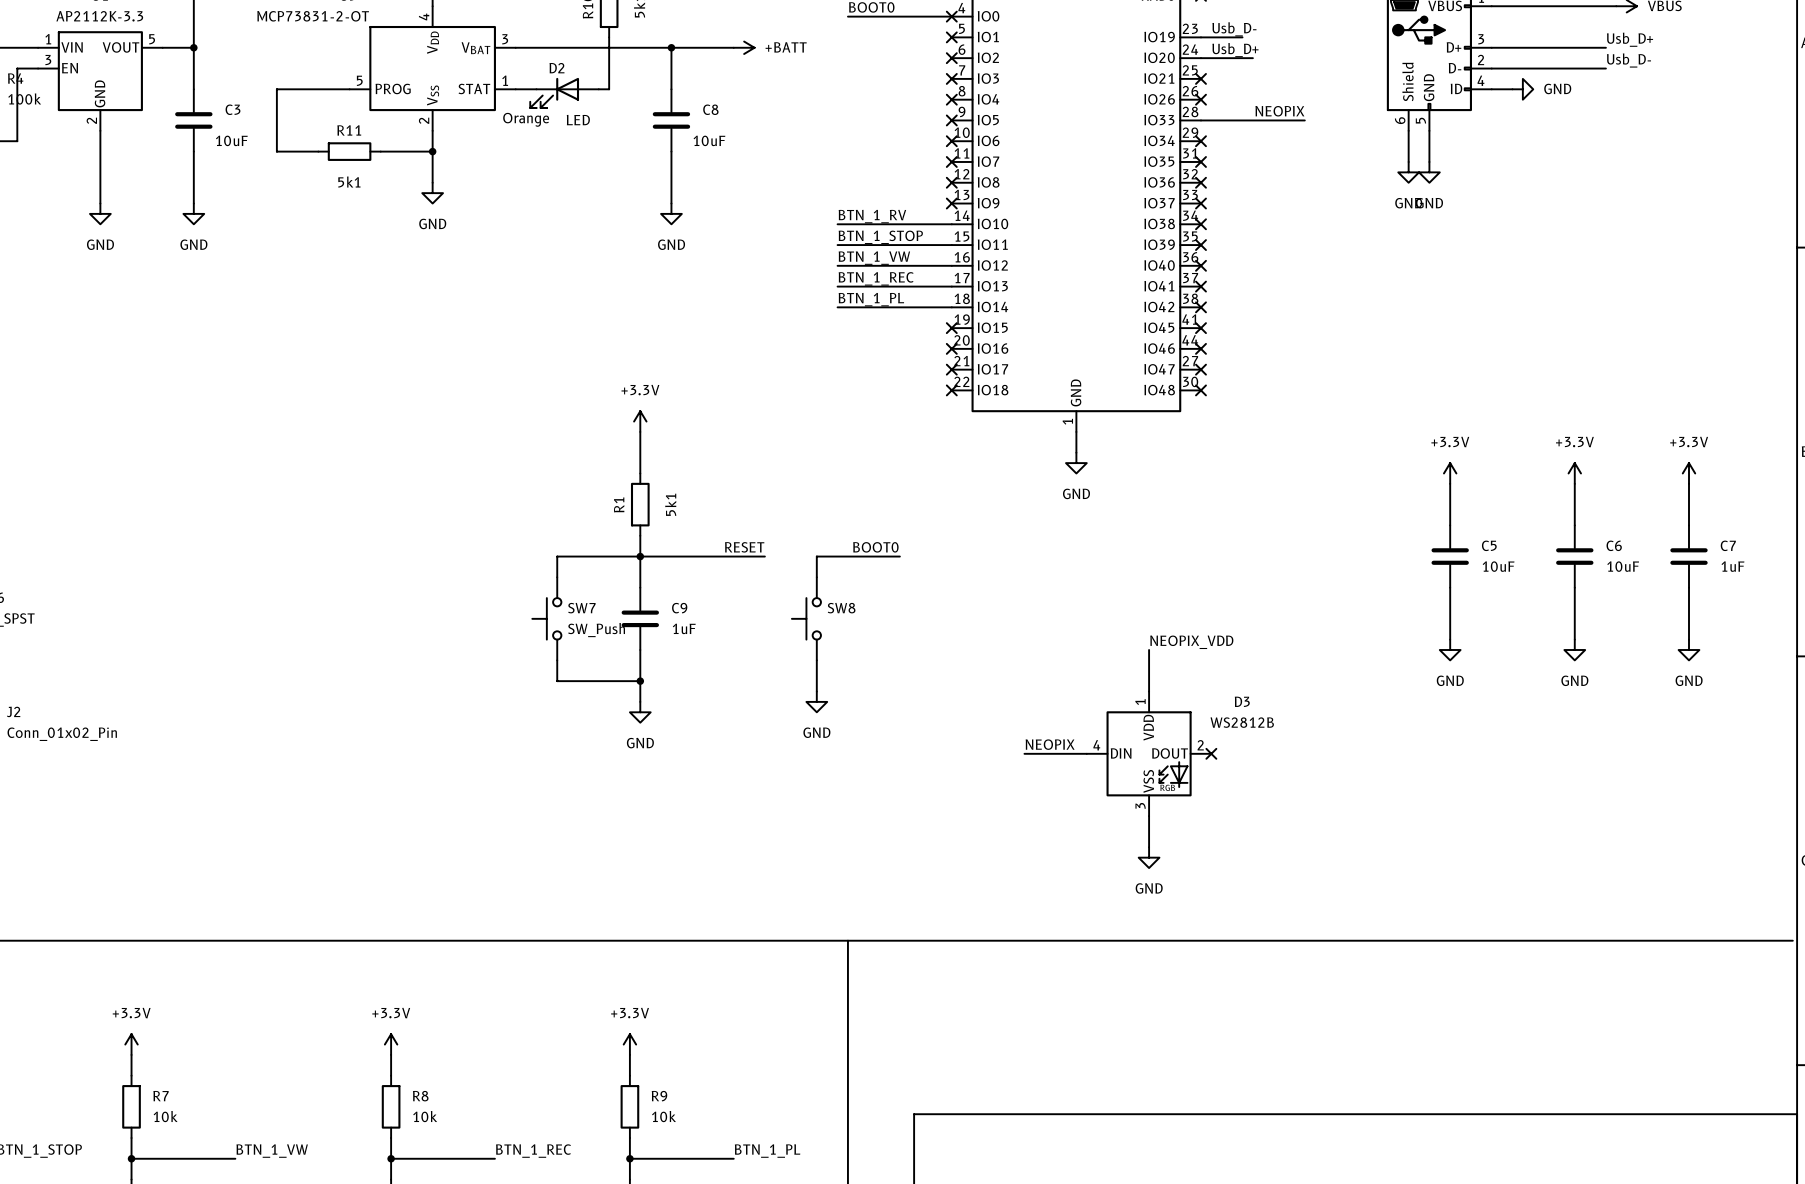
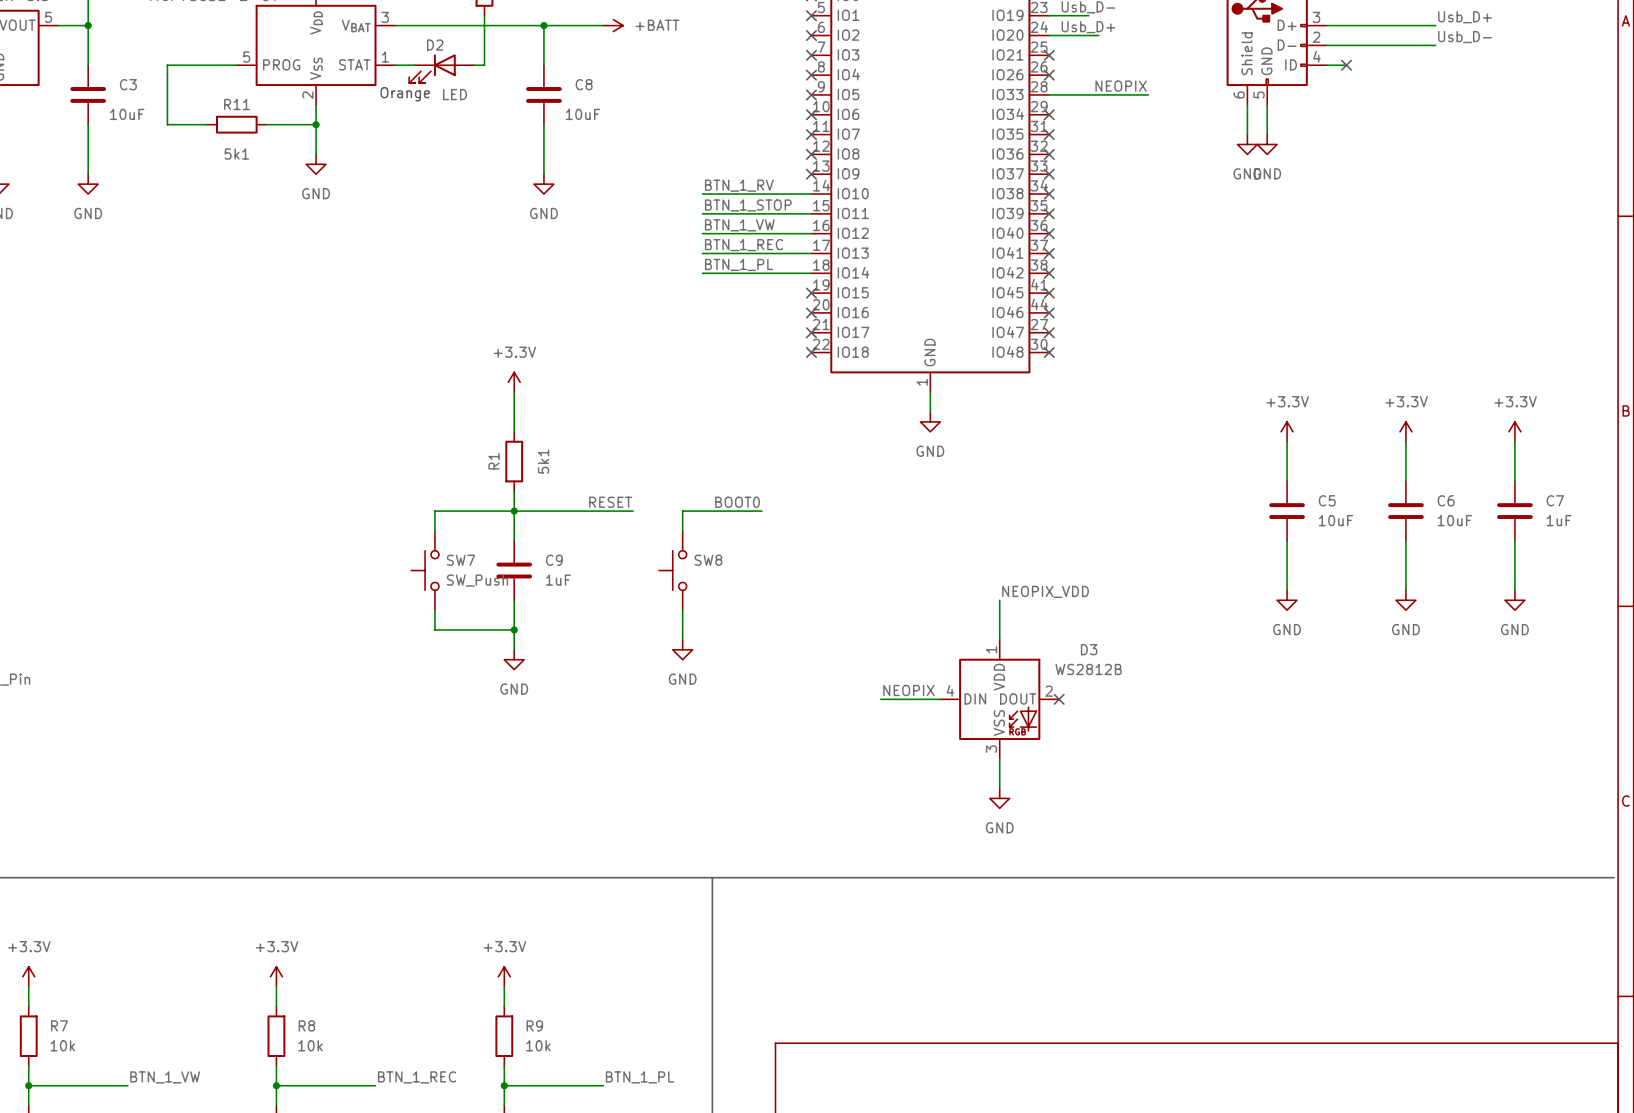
no-connect mark: none -> (1346, 65)
power symbol: GND (1522, 89) -> none

